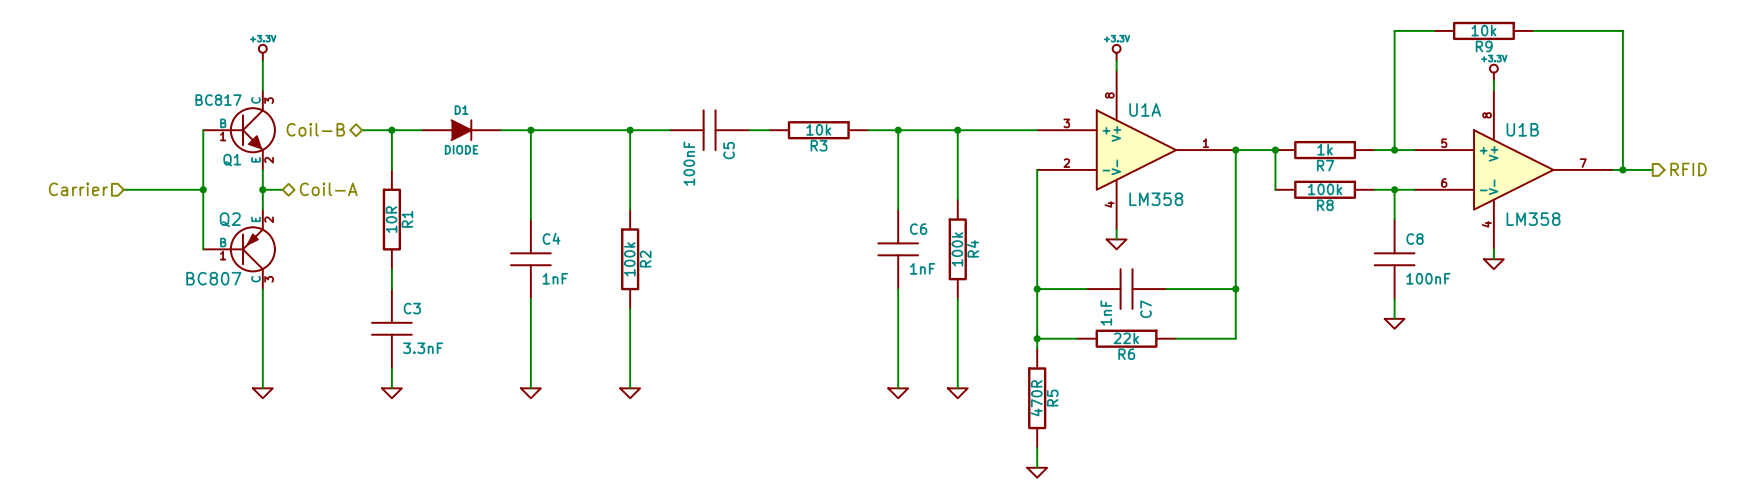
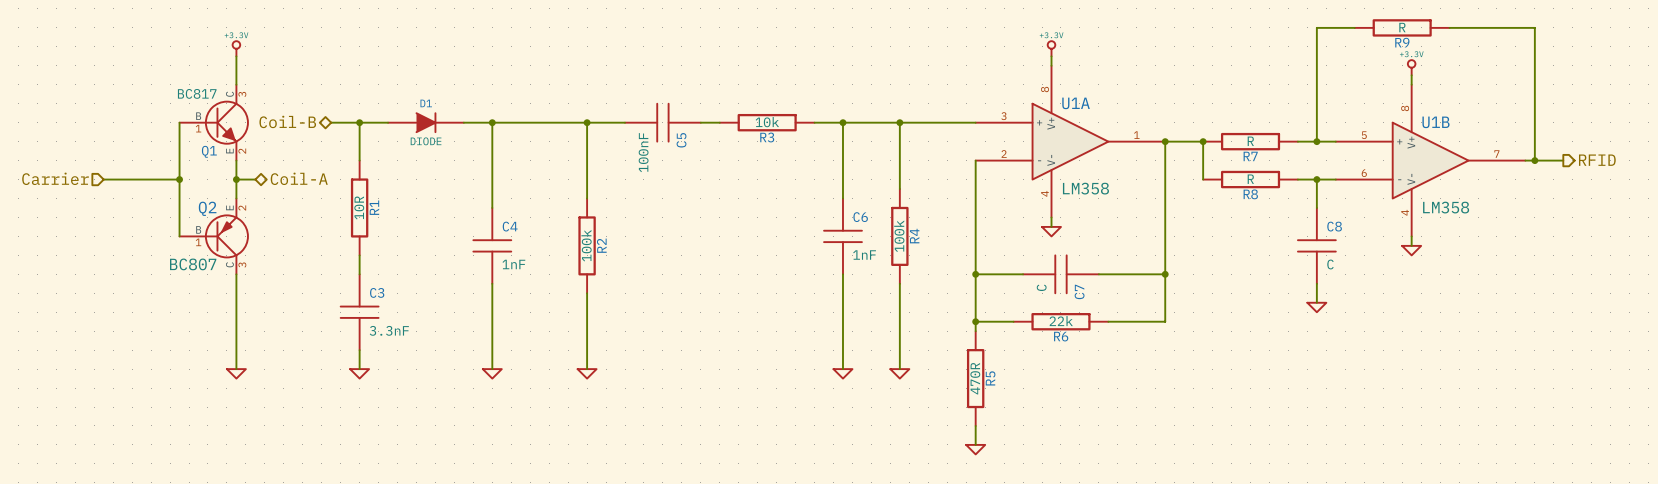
R9 value: 10k (1483, 30) -> R (1402, 27)
R7 value: 1k (1325, 149) -> R (1250, 141)
R8 value: 100k (1325, 189) -> R (1250, 179)
C8 value: 100nF (1428, 278) -> C (1330, 264)
C7 value: 1nF (1106, 313) -> C (1041, 287)

